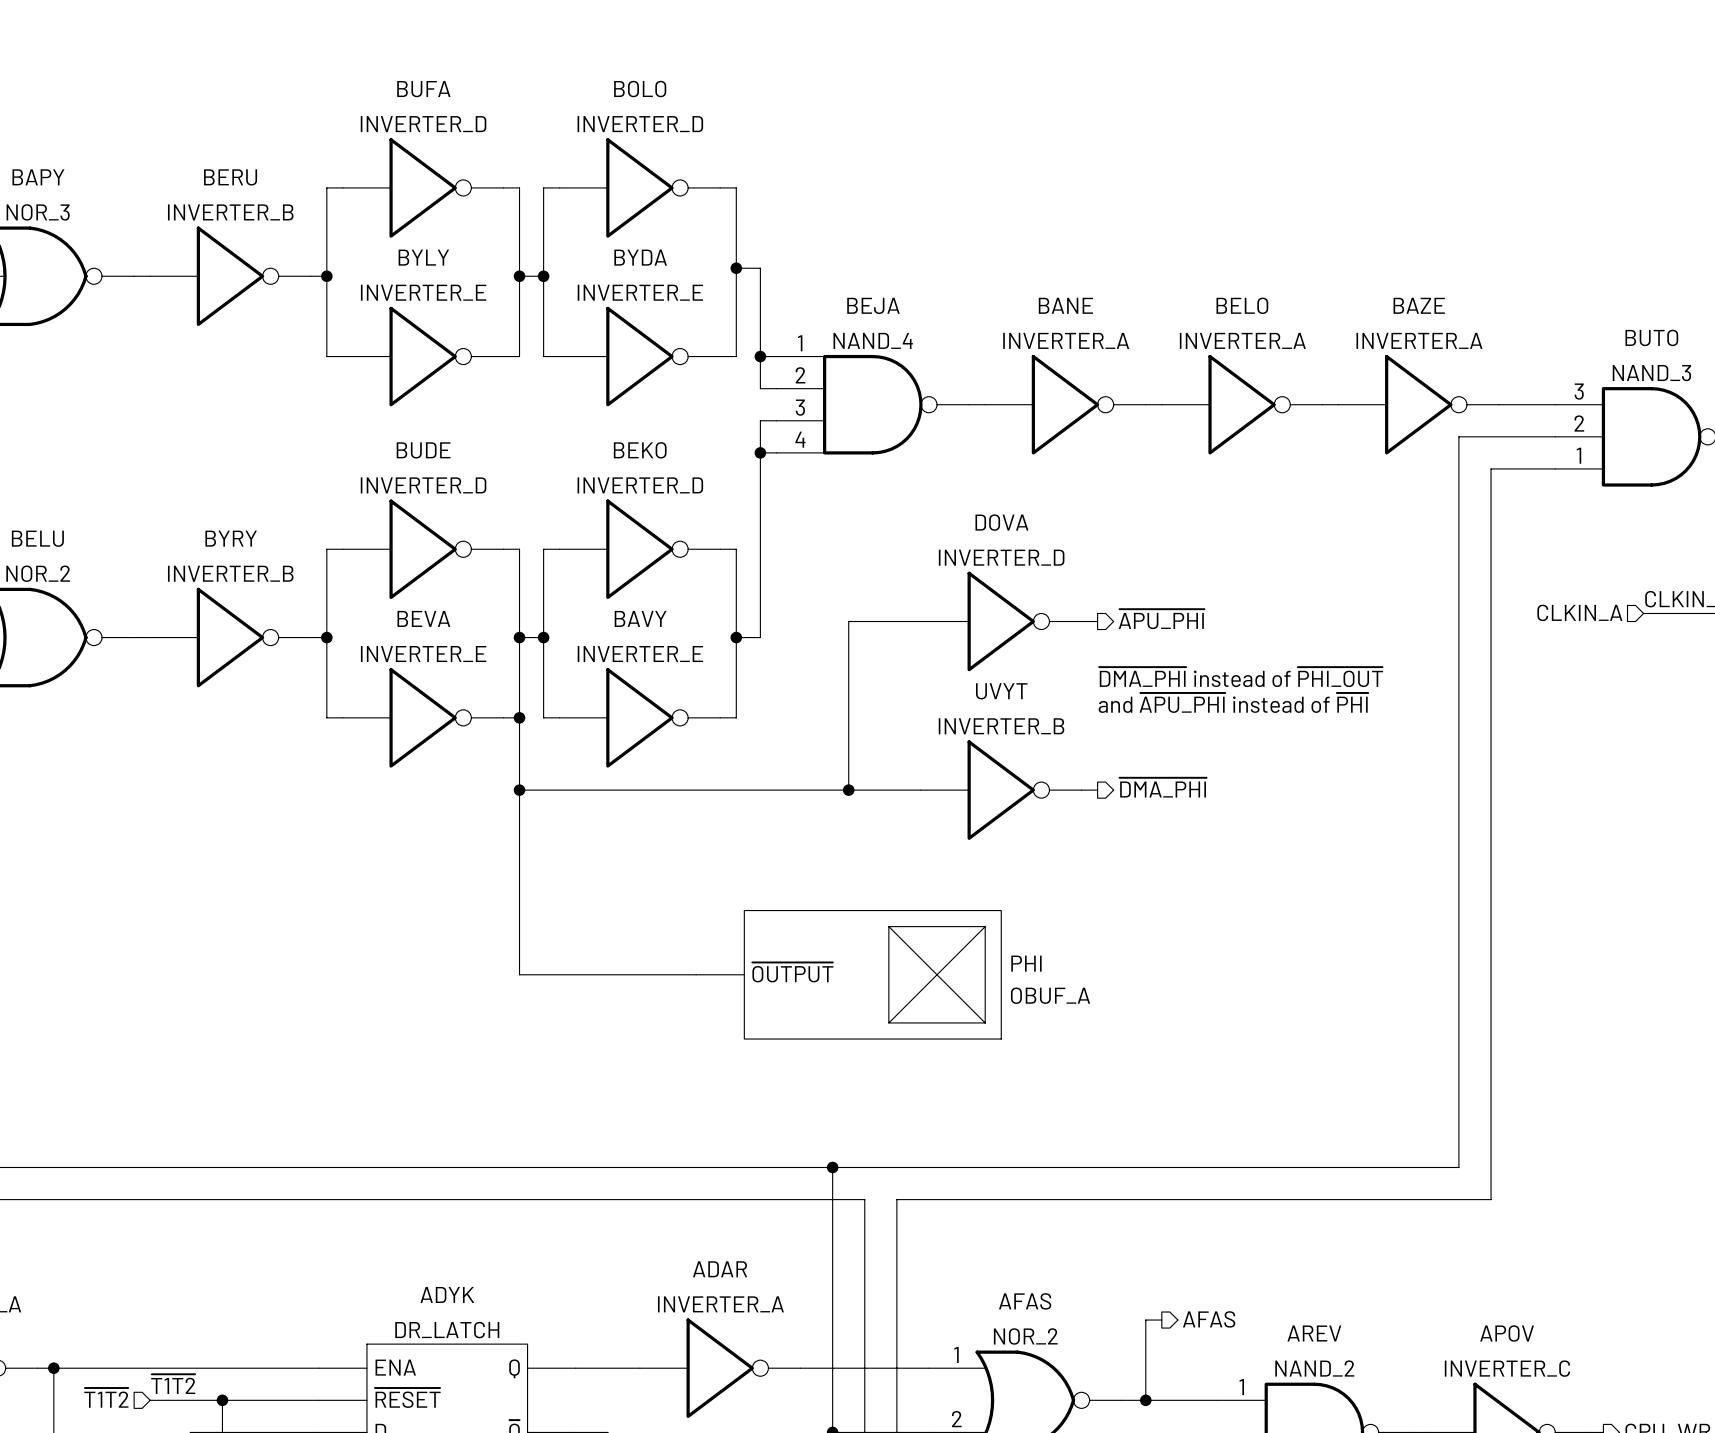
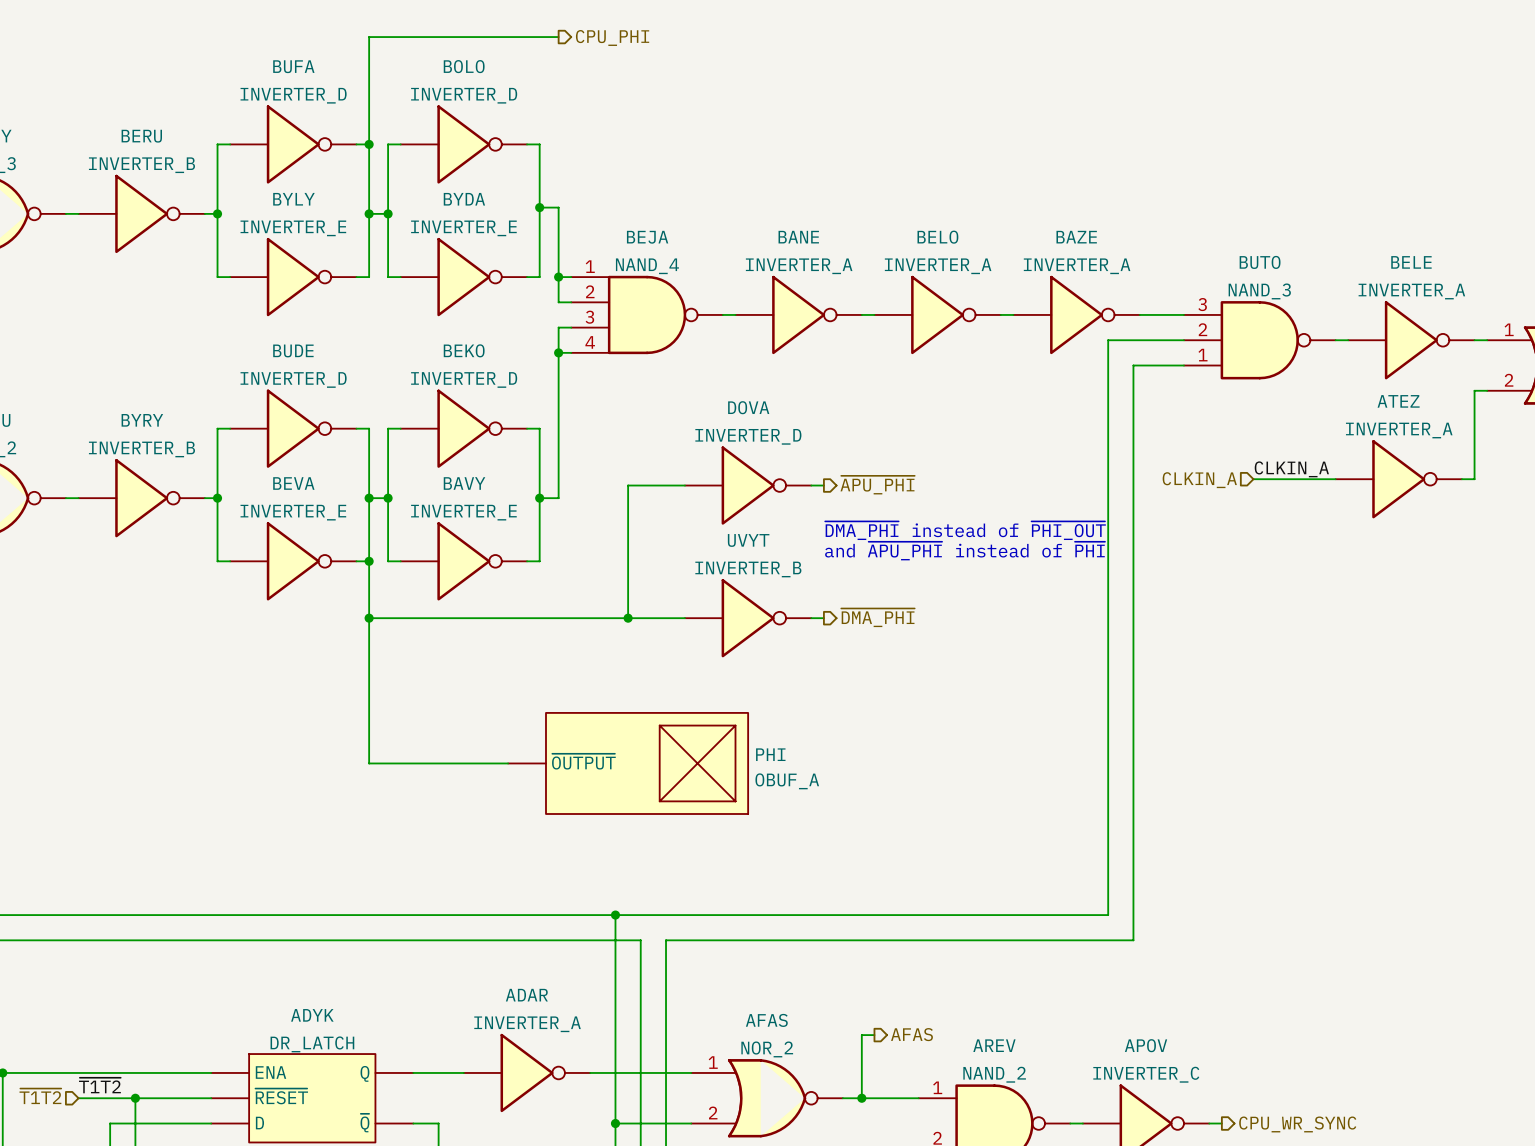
hierarchical label: none -> CPU_PHI (612, 37)
wire: none -> (558, 37) (369, 37) (369, 144)
junction: none -> (369, 144)

